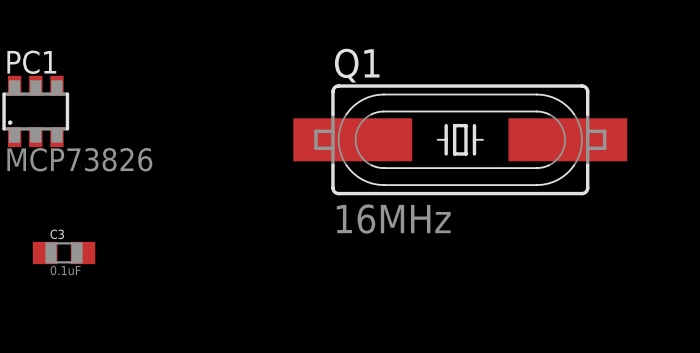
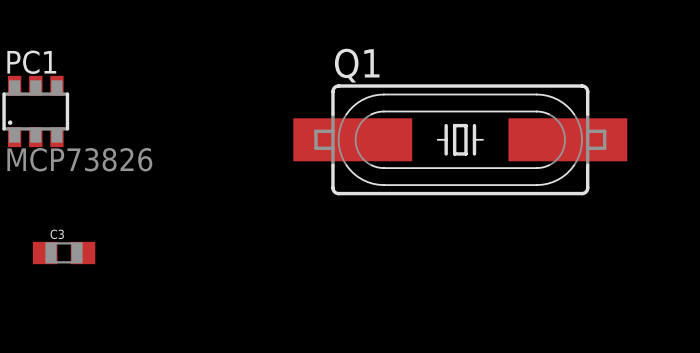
Q1 value: 16MHz (393, 219) -> none
C3 value: 0.1uF (65, 270) -> none

